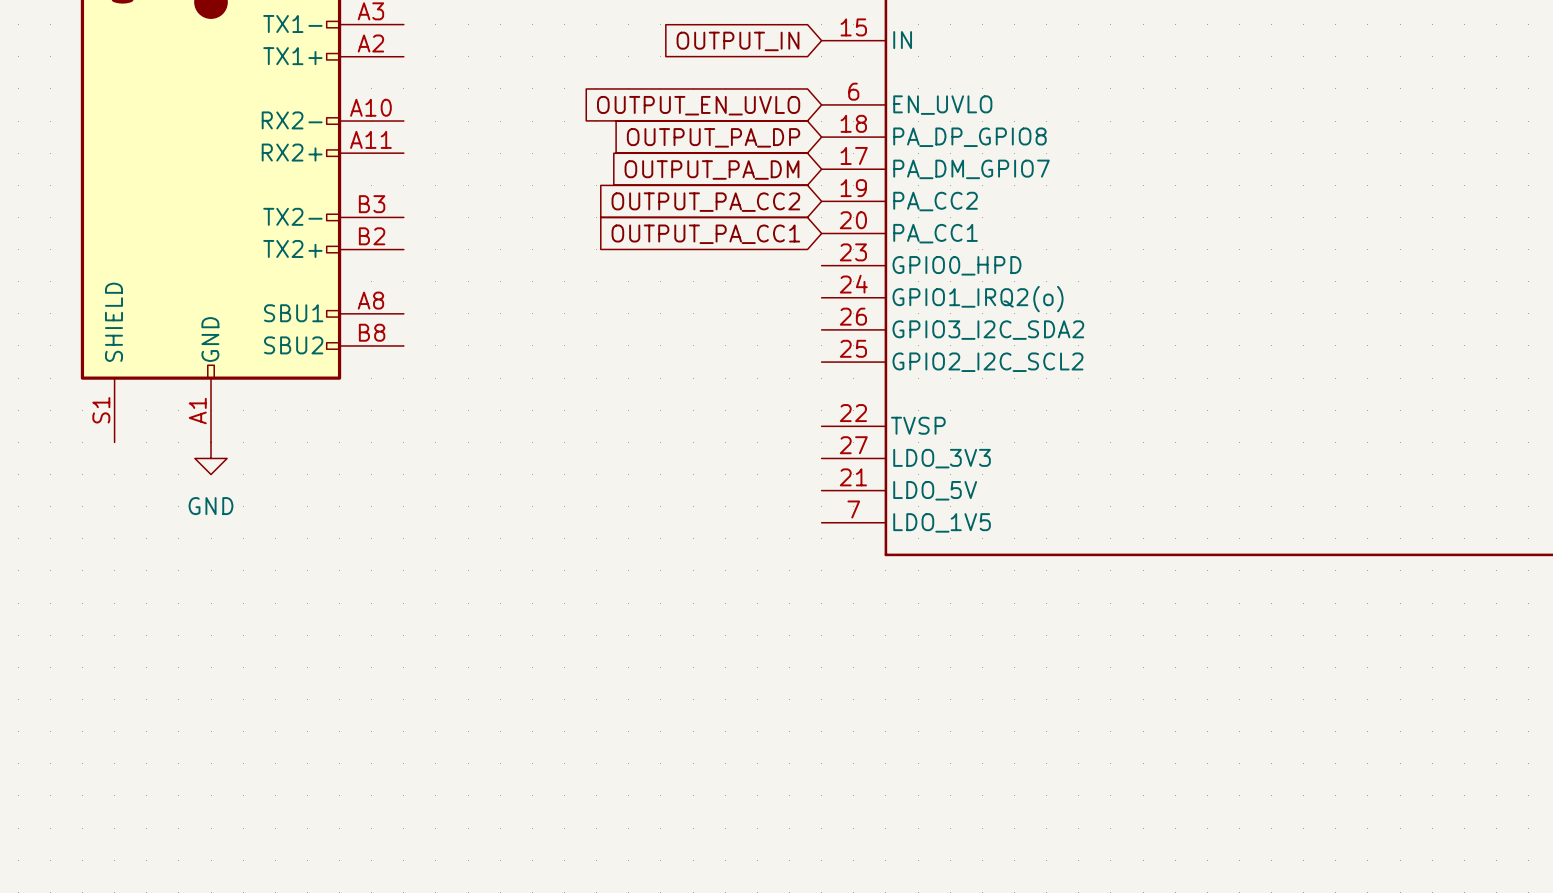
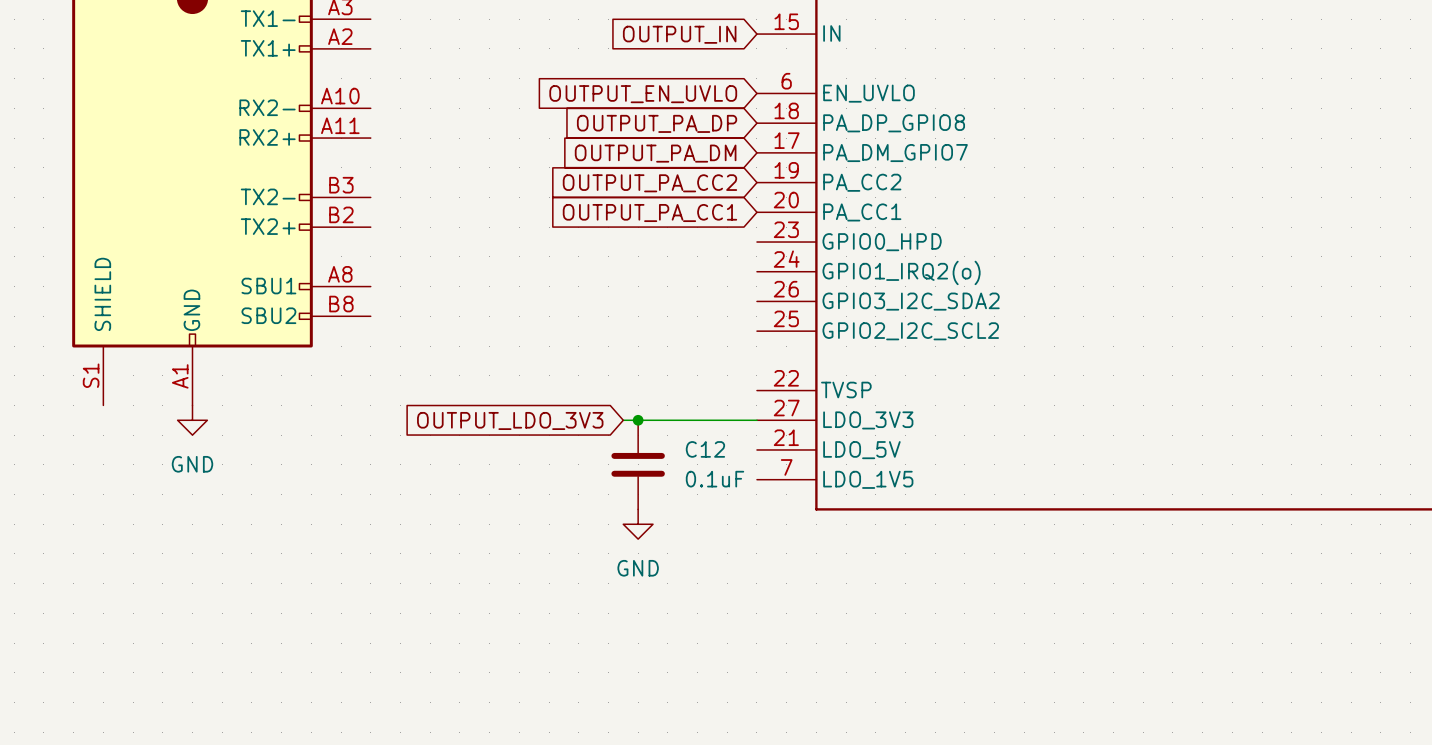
wire: none -> (623, 420) (756, 420)
junction: none -> (638, 420)
global label: none -> OUTPUT_LDO_3V3 (510, 420)
C12: none -> 0.1uF (638, 464)
power symbol: none -> GND (638, 524)

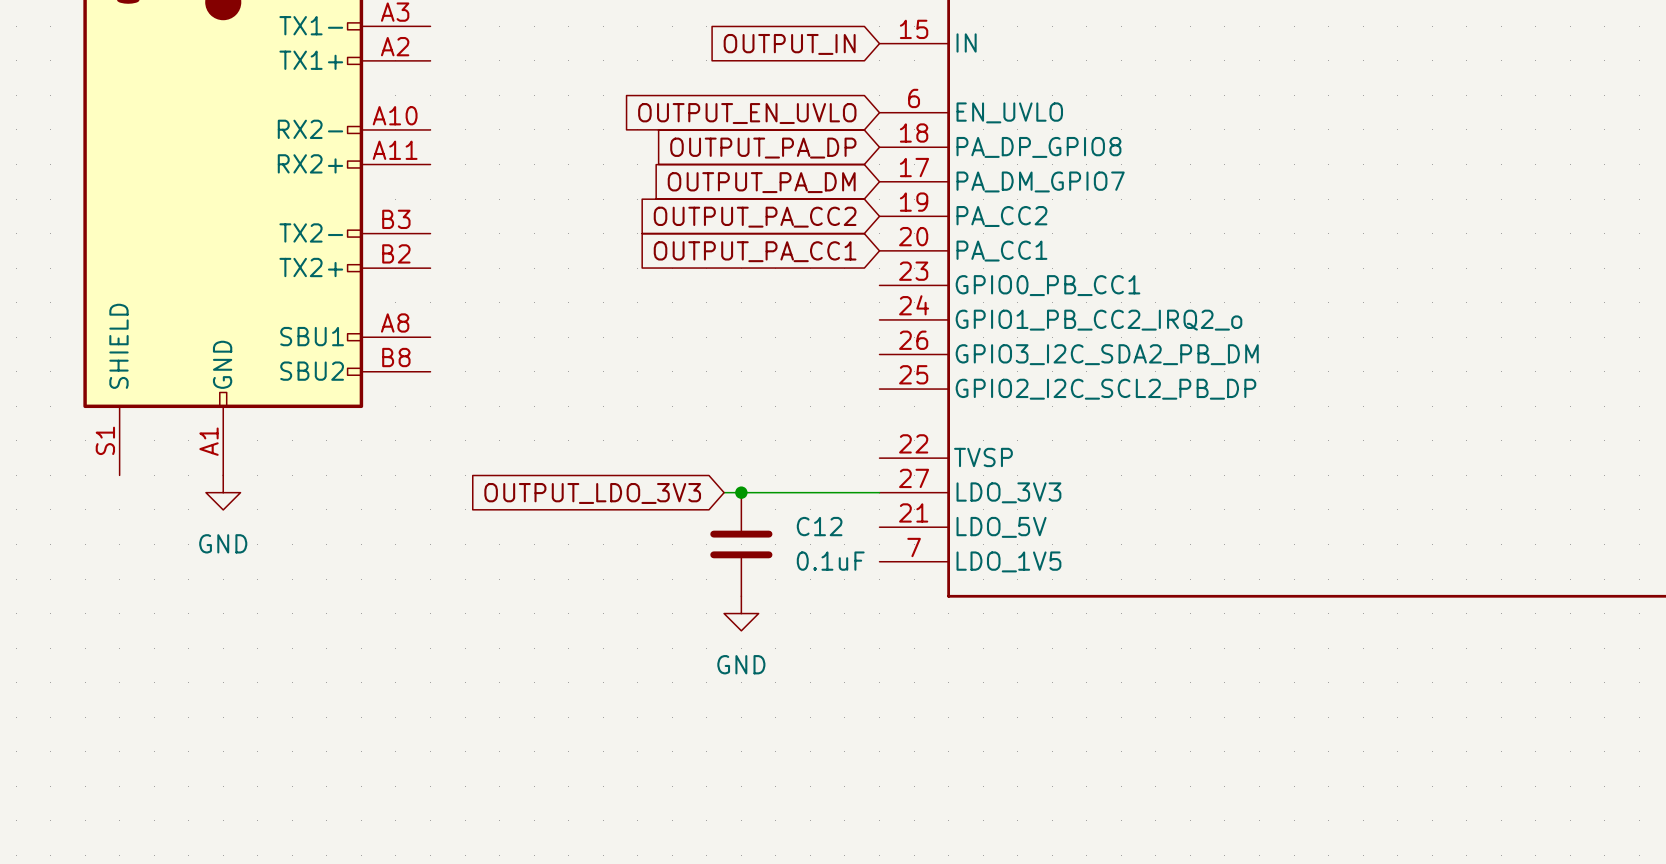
part pin name: GPIO0_HPD (882, 242) -> GPIO0_PB_CC1 (1048, 285)
part pin name: GPIO1_IRQ2(o) (901, 272) -> GPIO1_PB_CC2_IRQ2_o (1098, 320)
part pin name: GPIO3_I2C_SDA2 (911, 301) -> GPIO3_I2C_SDA2_PB_DM (1107, 354)
part pin name: GPIO2_I2C_SCL2 (910, 331) -> GPIO2_I2C_SCL2_PB_DP (1105, 389)

